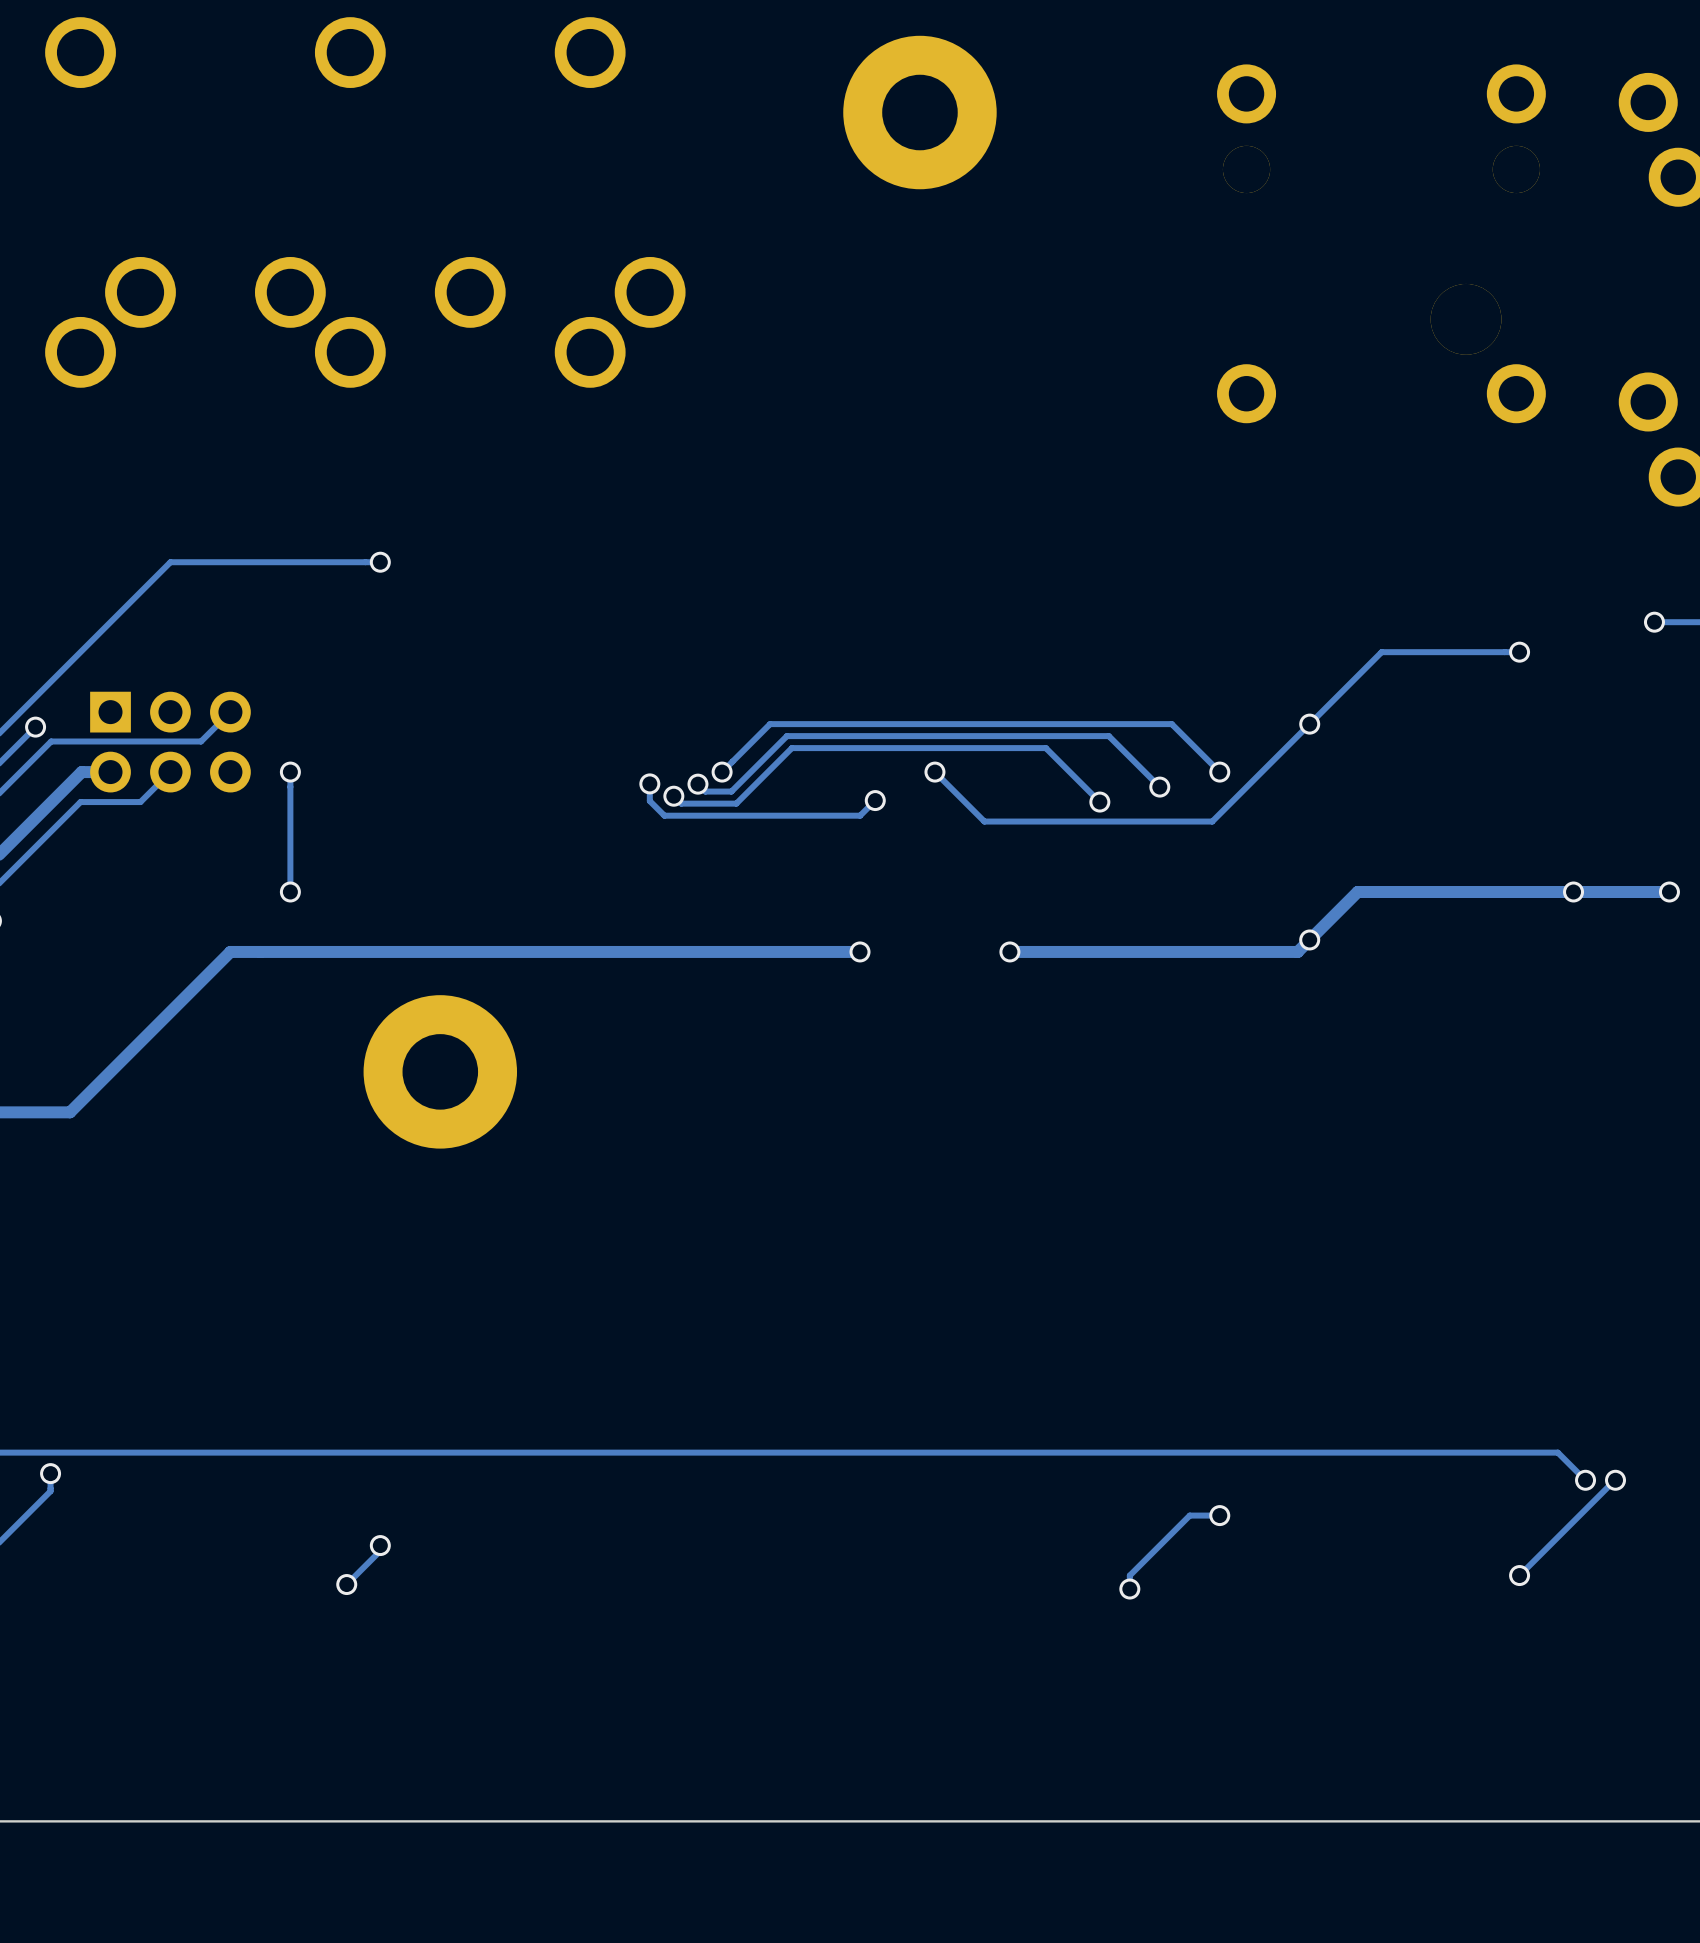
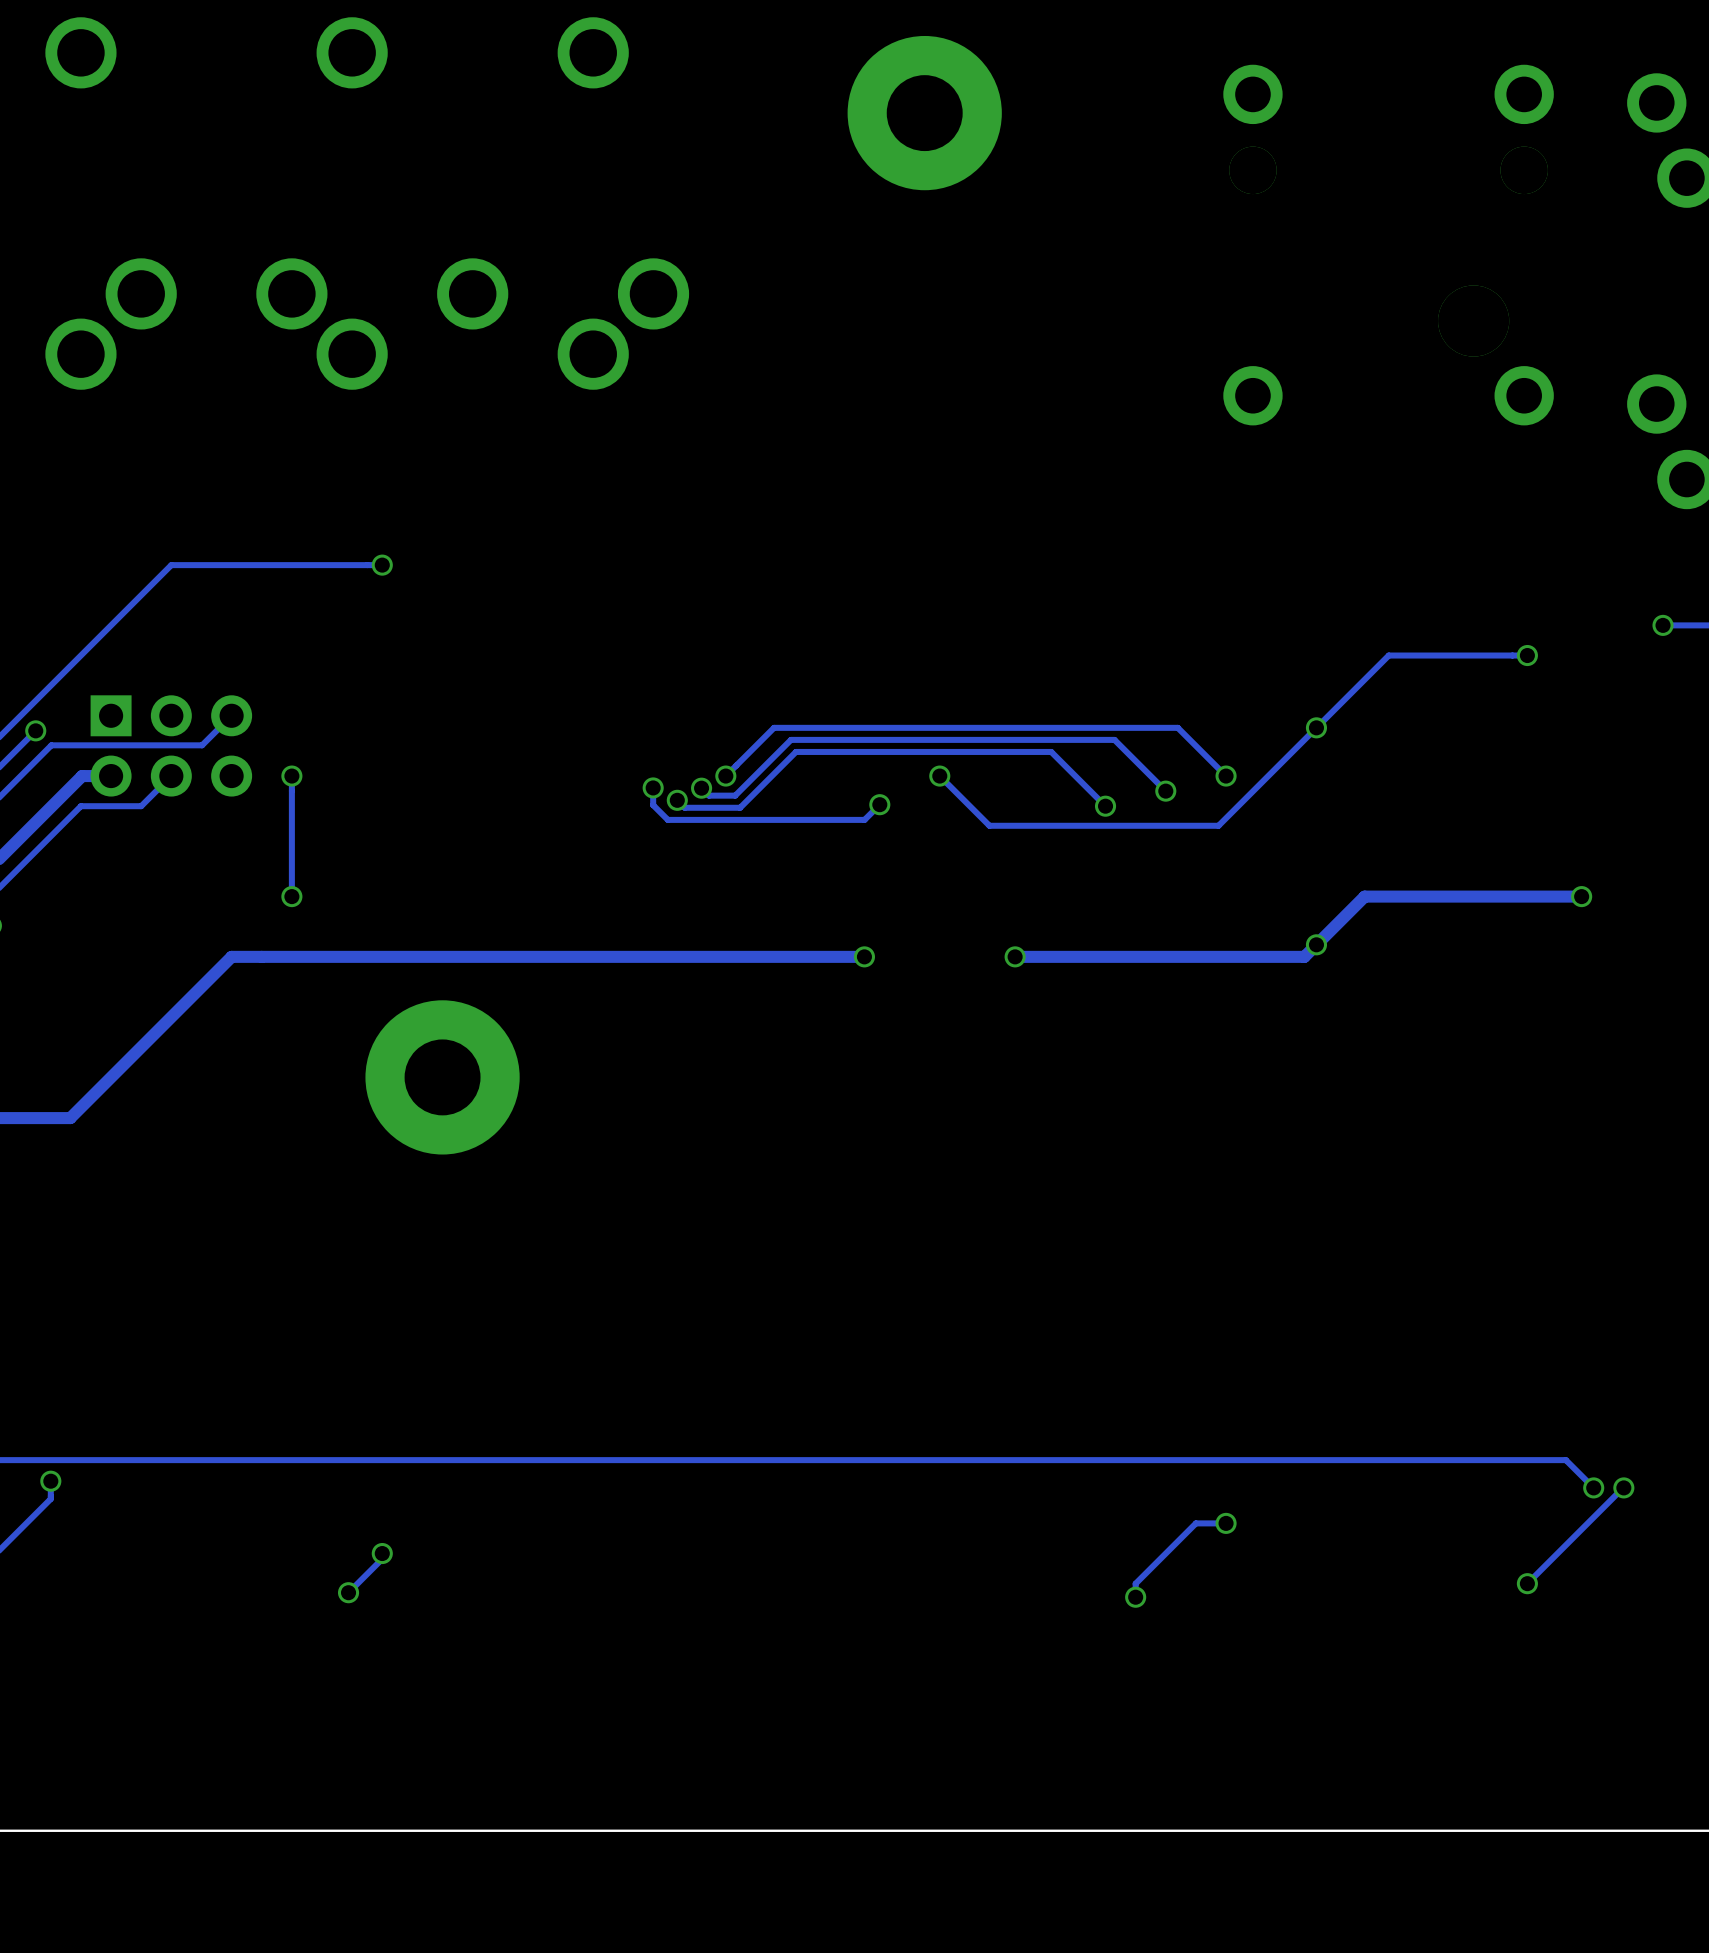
track: (1669, 891) (1573, 891) -> none
via: (1669, 891) -> none

